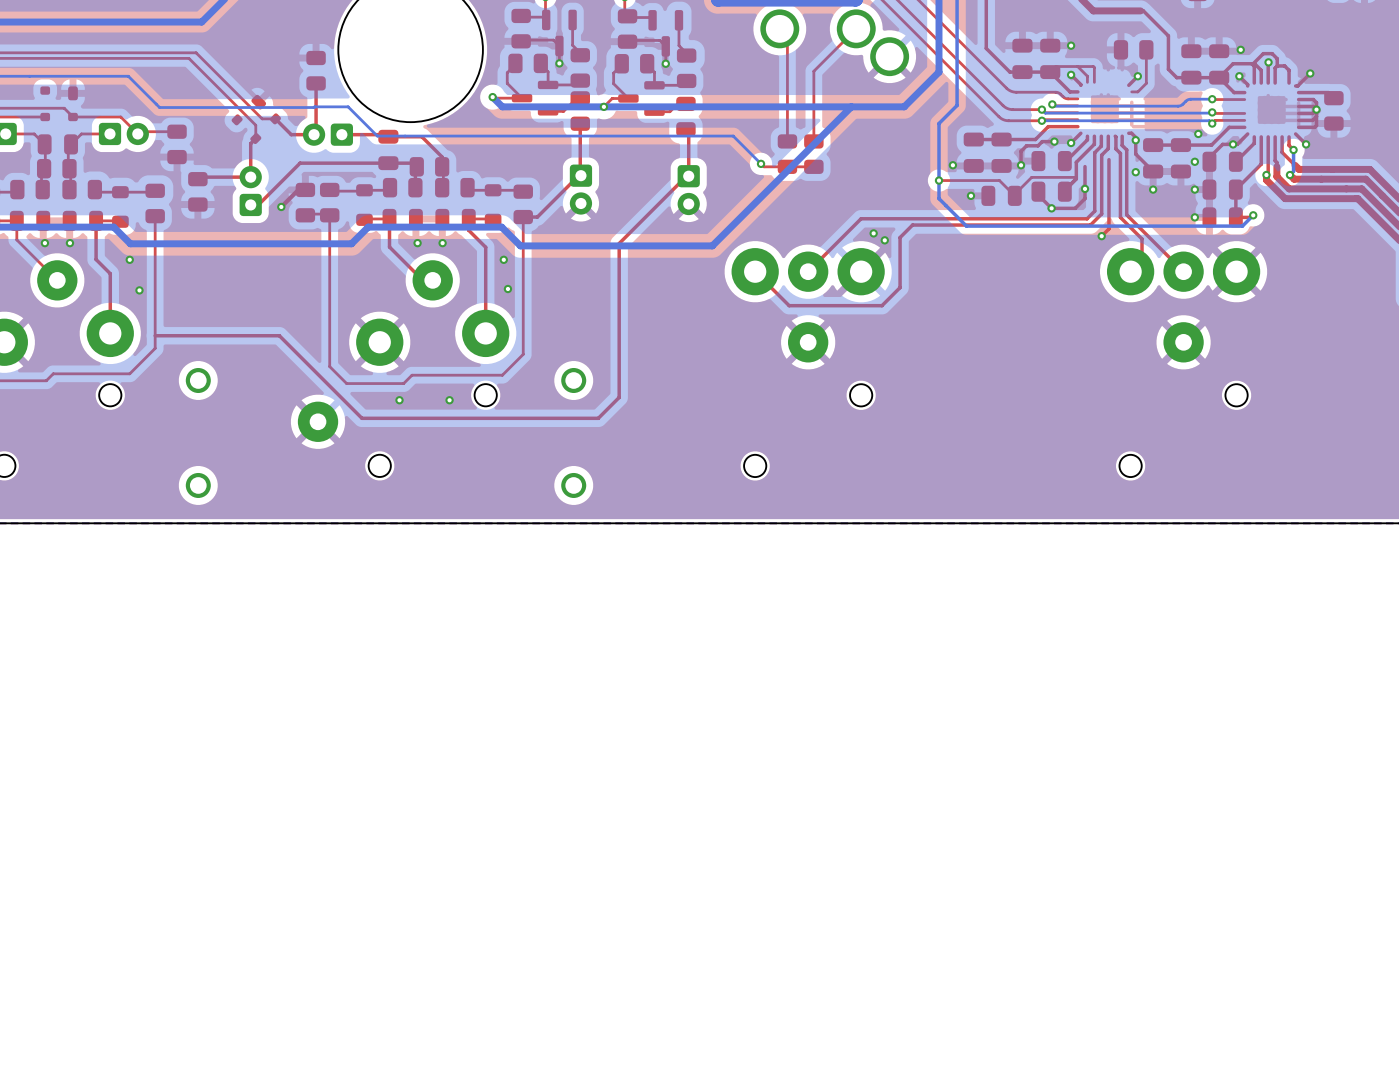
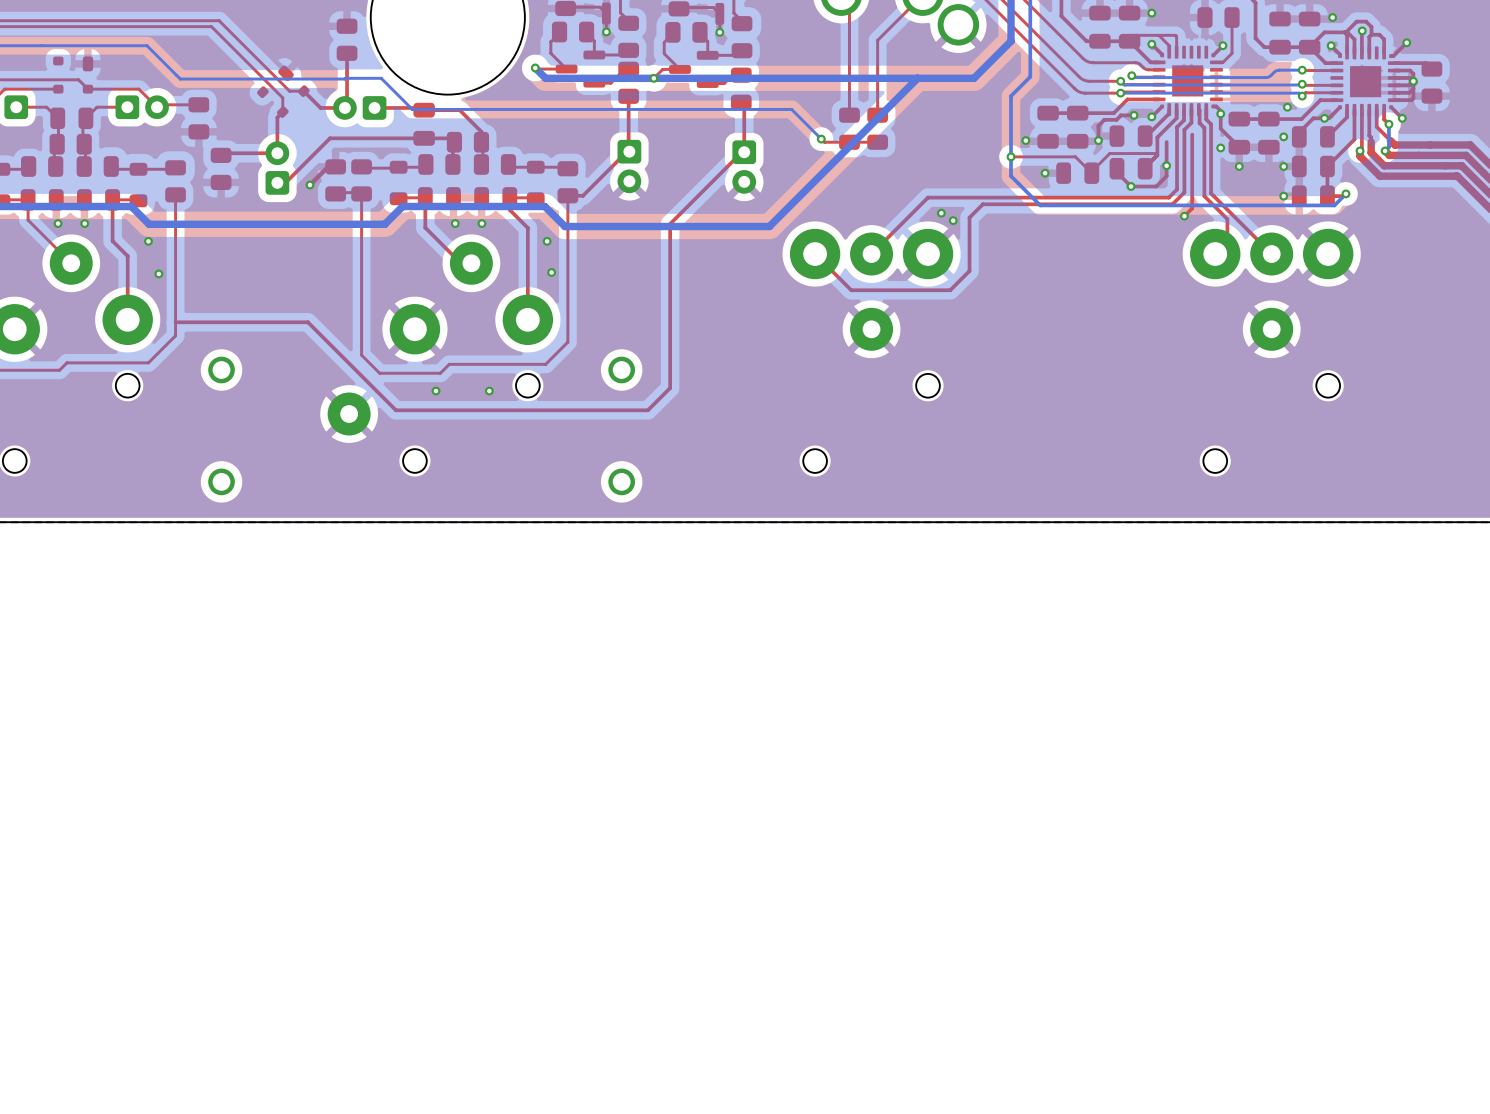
part: none -> (1187, 80)
part: none -> (1365, 81)

